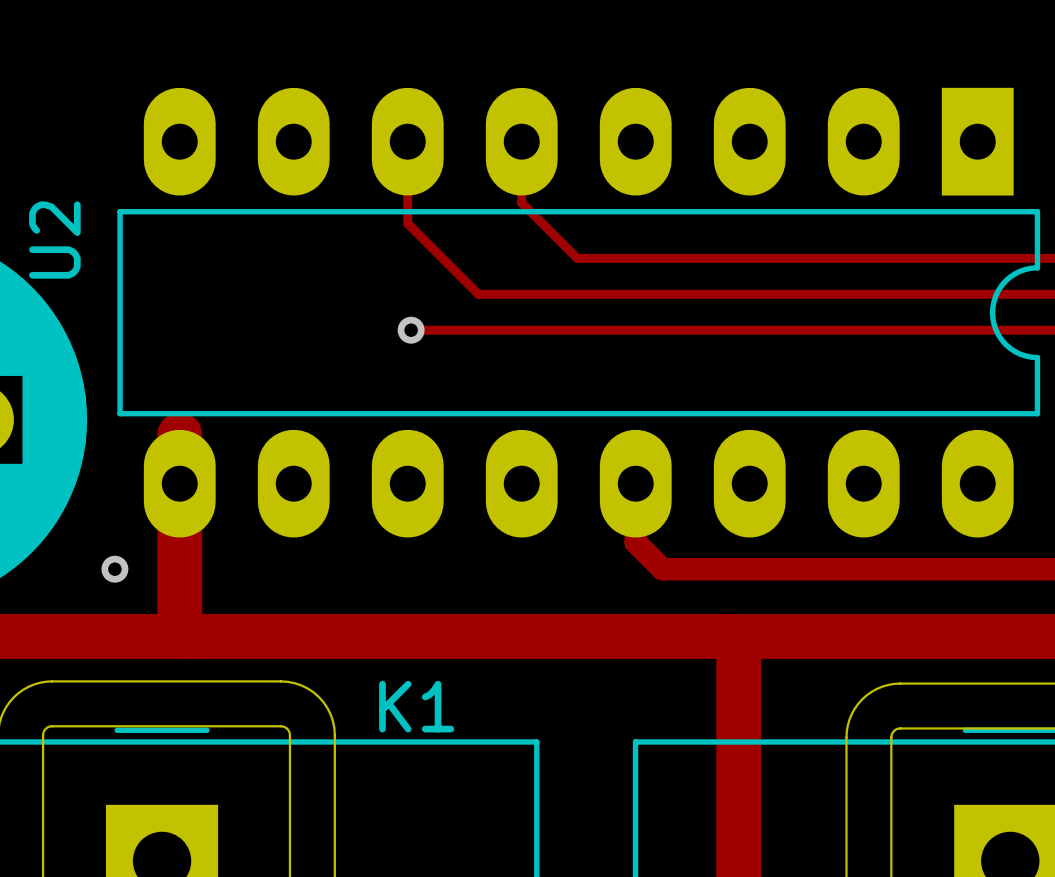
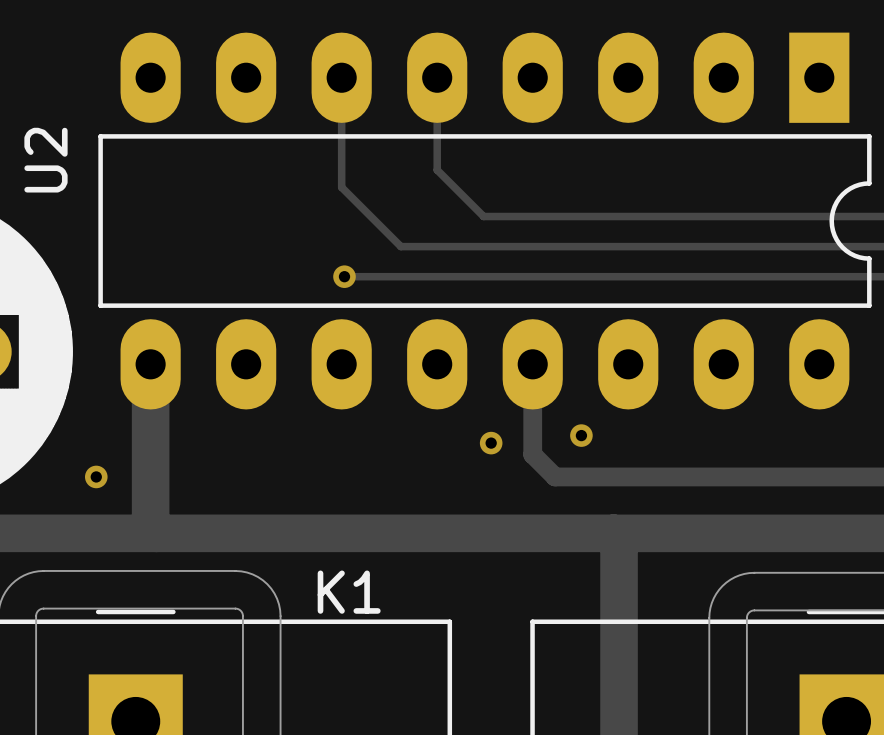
U2 position: (578, 312) -> (484, 221)
via: none -> (581, 435)
via: none -> (491, 443)

